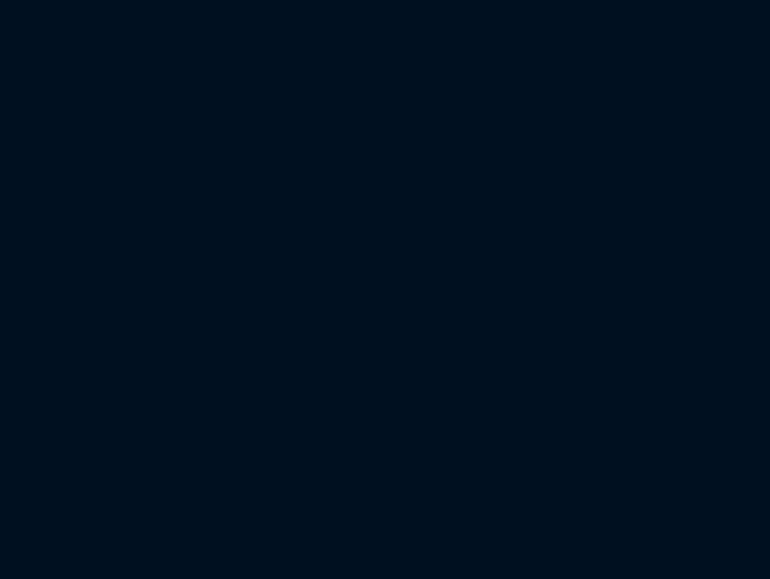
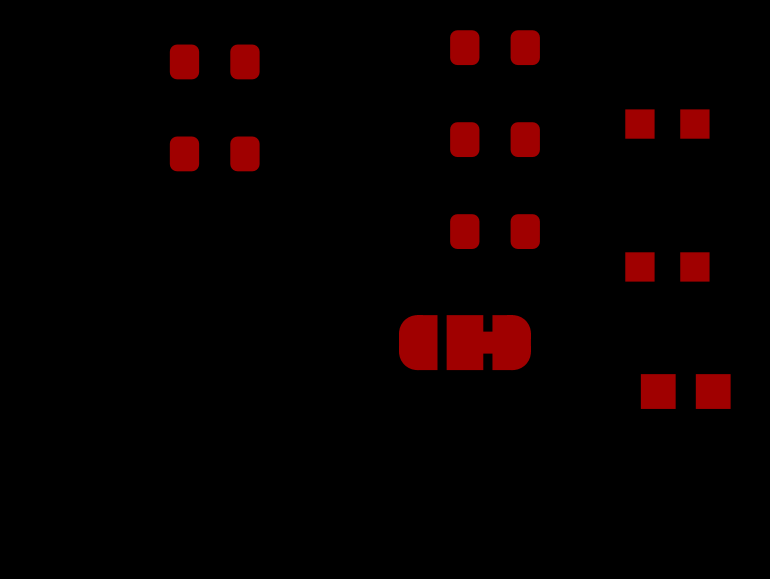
part: none -> (495, 47)
part: none -> (214, 61)
part: none -> (667, 124)
part: none -> (495, 139)
part: none -> (214, 153)
part: none -> (495, 231)
part: none -> (667, 266)
part: none -> (464, 342)
part: none -> (685, 391)

